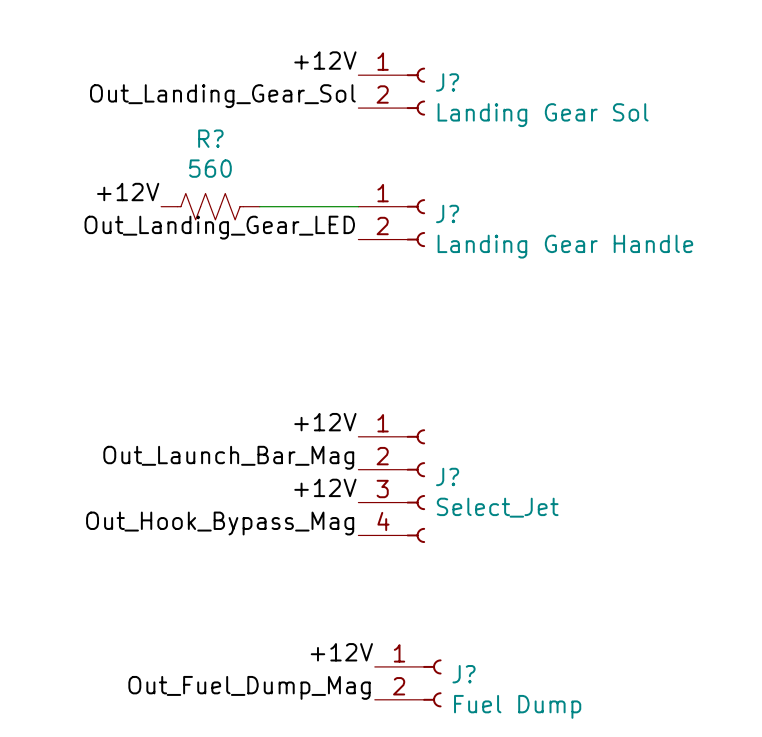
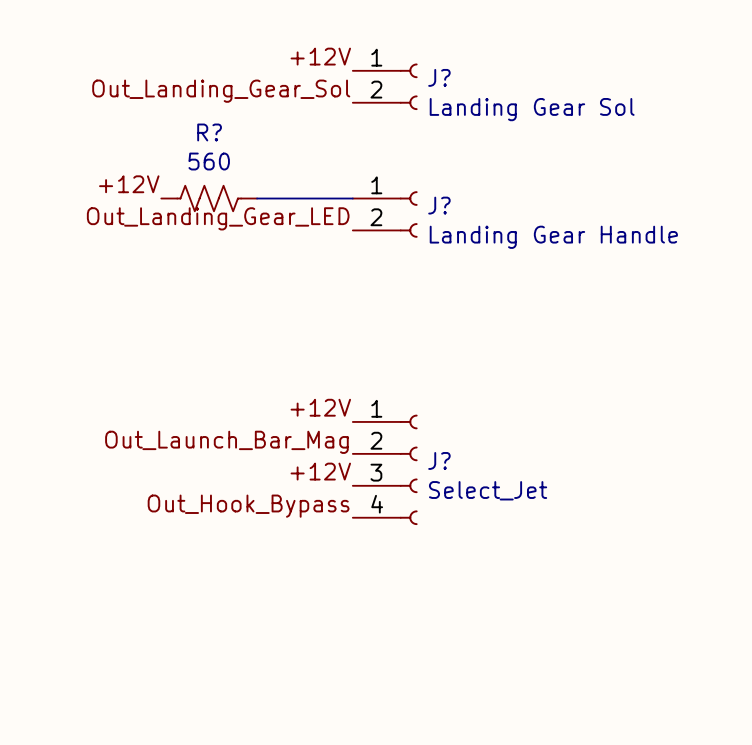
label: Out_Hook_Bypass_Mag (220, 523) -> Out_Hook_Bypass (248, 506)
label: +12V (341, 652) -> none
J?: Fuel Dump (408, 683) -> none
label: Out_Fuel_Dump_Mag (249, 687) -> none

